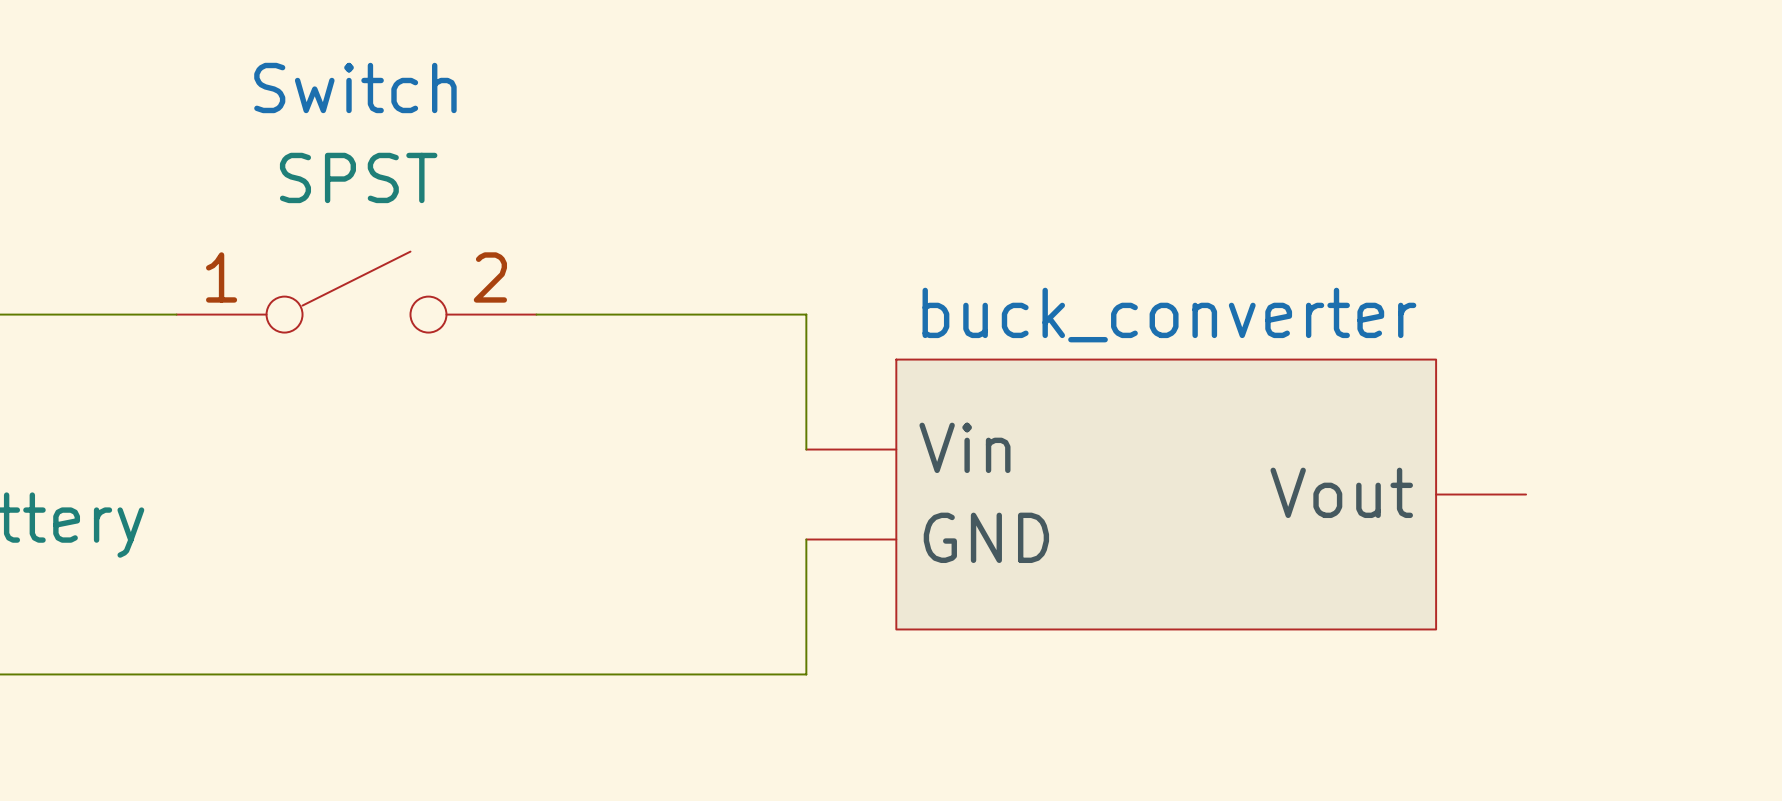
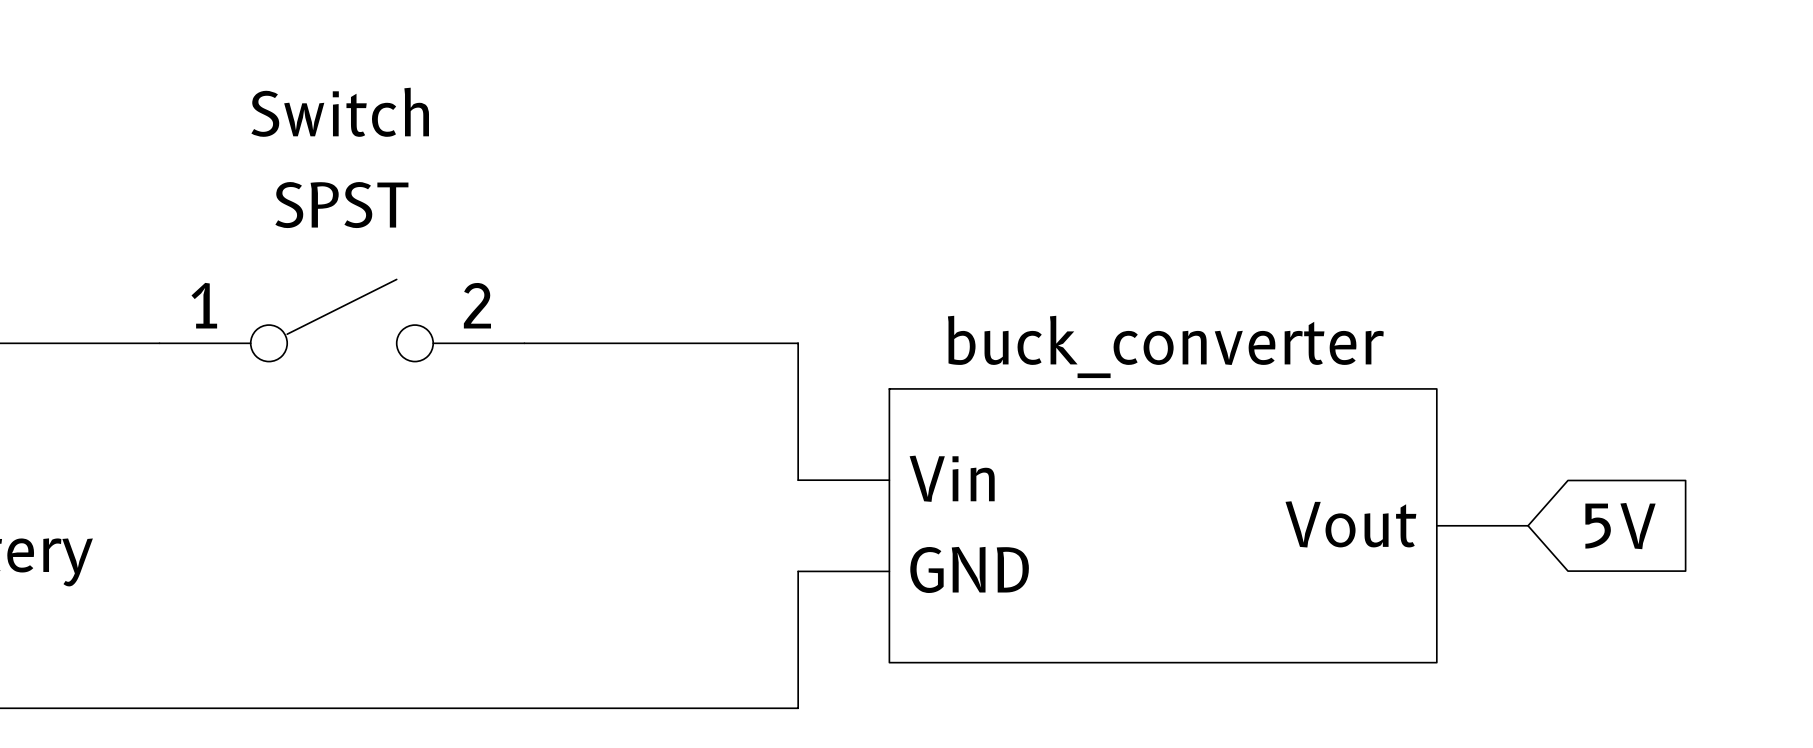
global label: none -> 5V (1620, 526)

